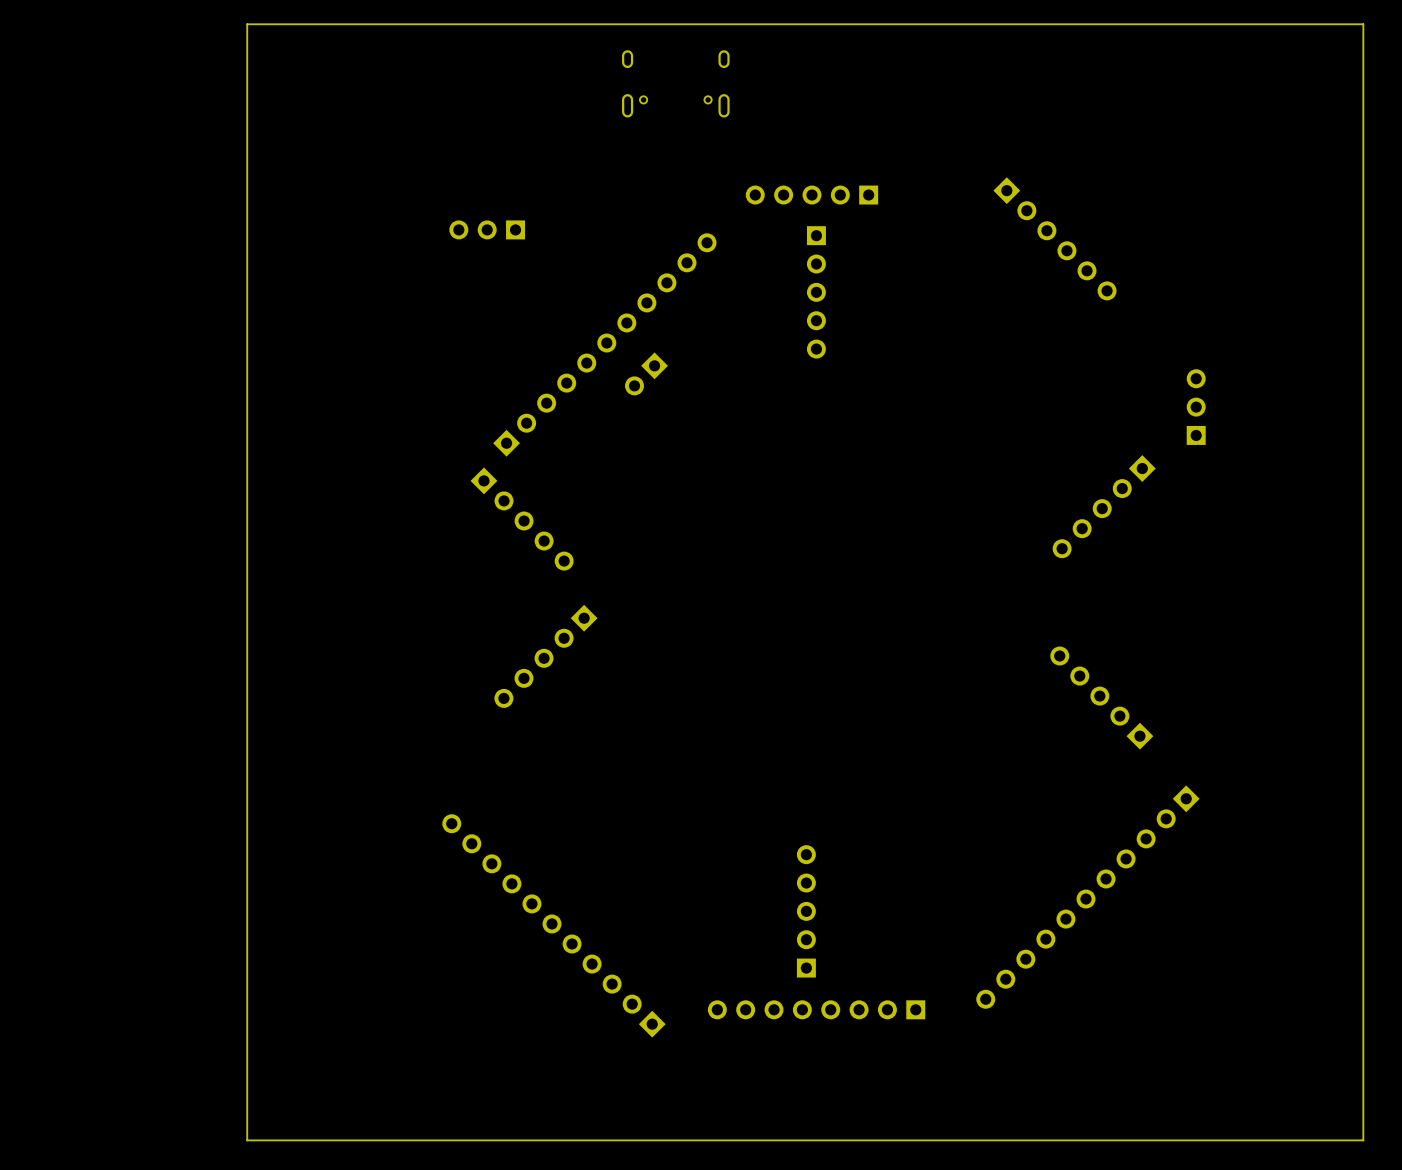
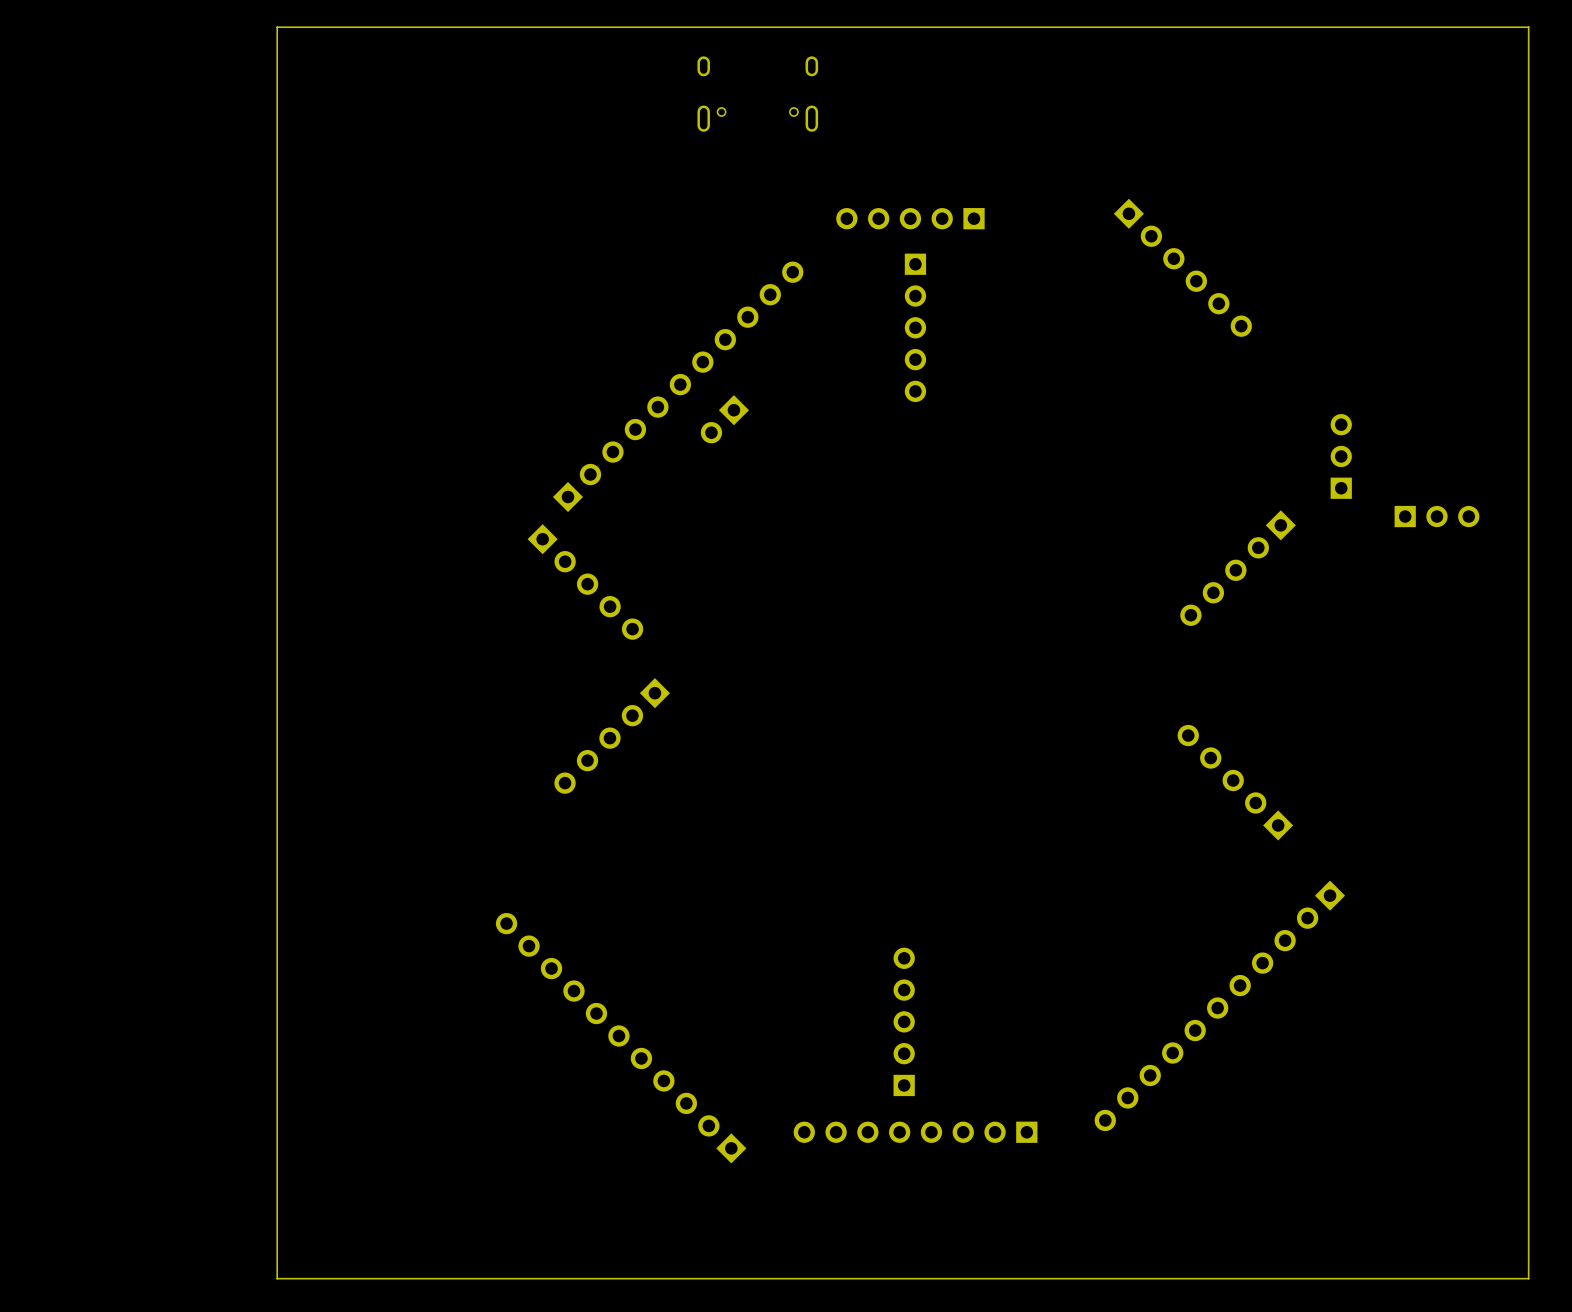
part: (487, 229) -> none
part: none -> (1436, 516)

